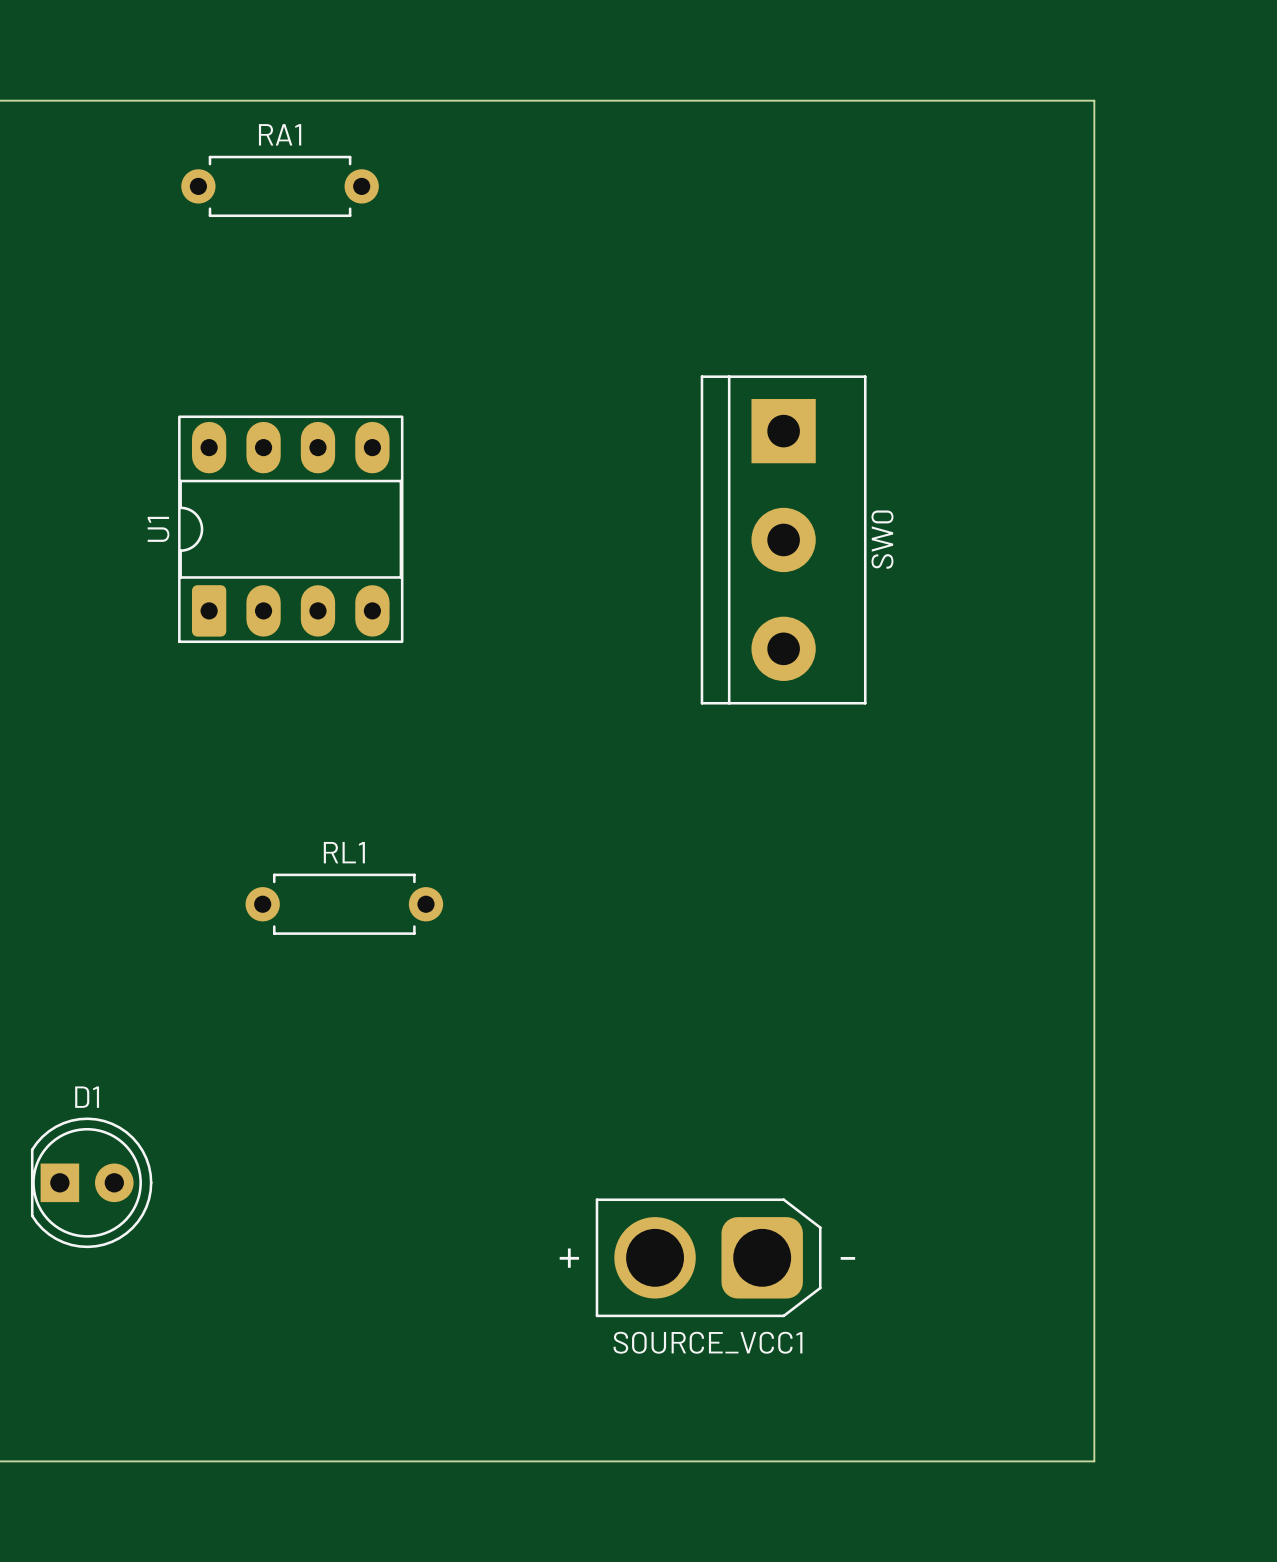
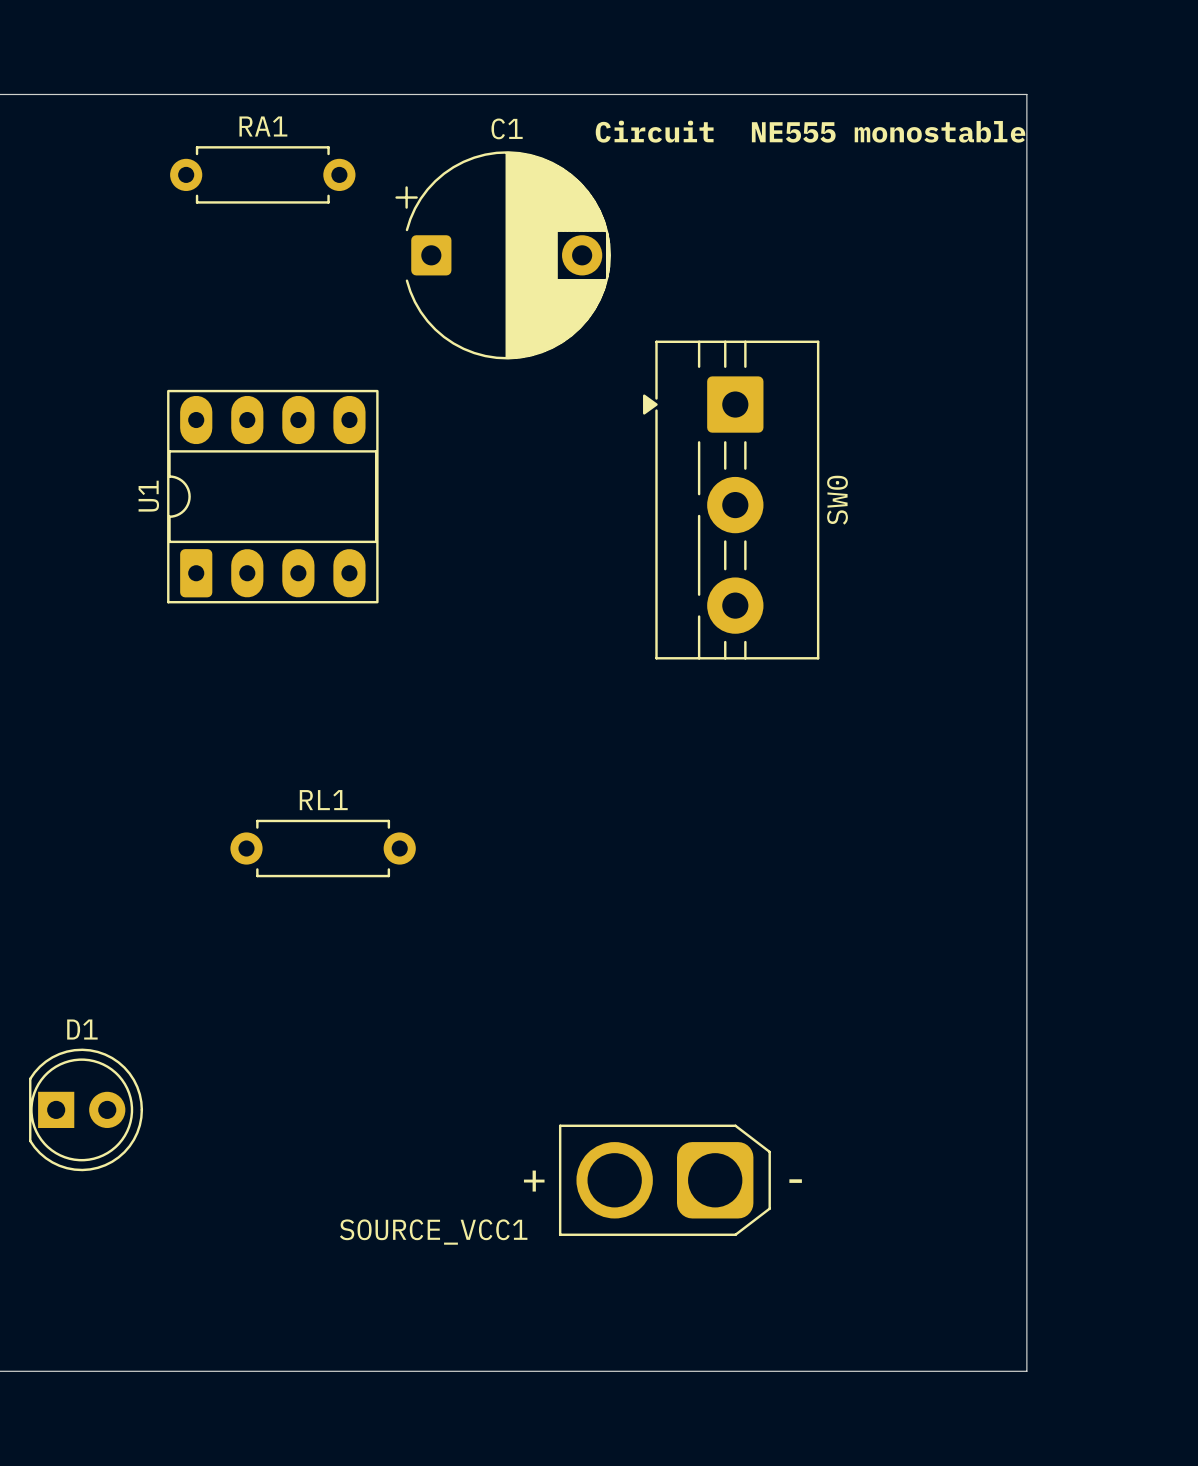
text: none -> Circuit NE555 monostable (810, 131)
C1: none -> (503, 255)
SW0 footprint: [700, 375, 867, 705] -> [643, 340, 820, 660]
SOURCE_VCC1 name position: SOURCE_VCC1 (707, 1342) -> SOURCE_VCC1 (433, 1232)

